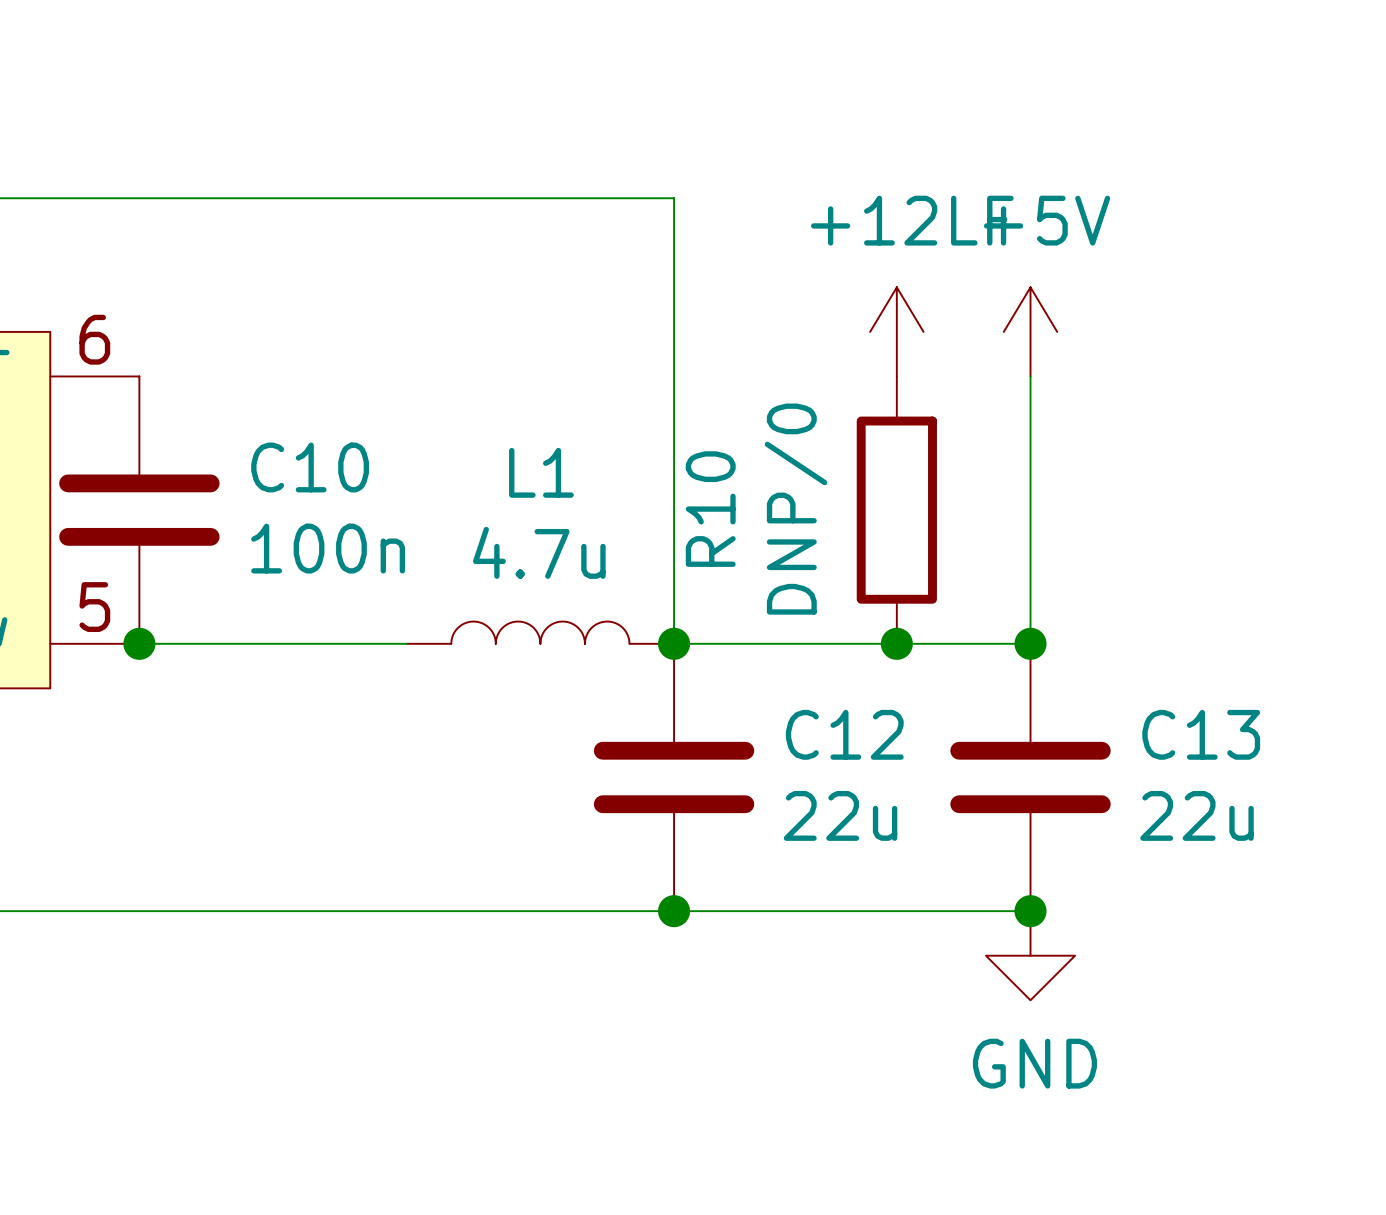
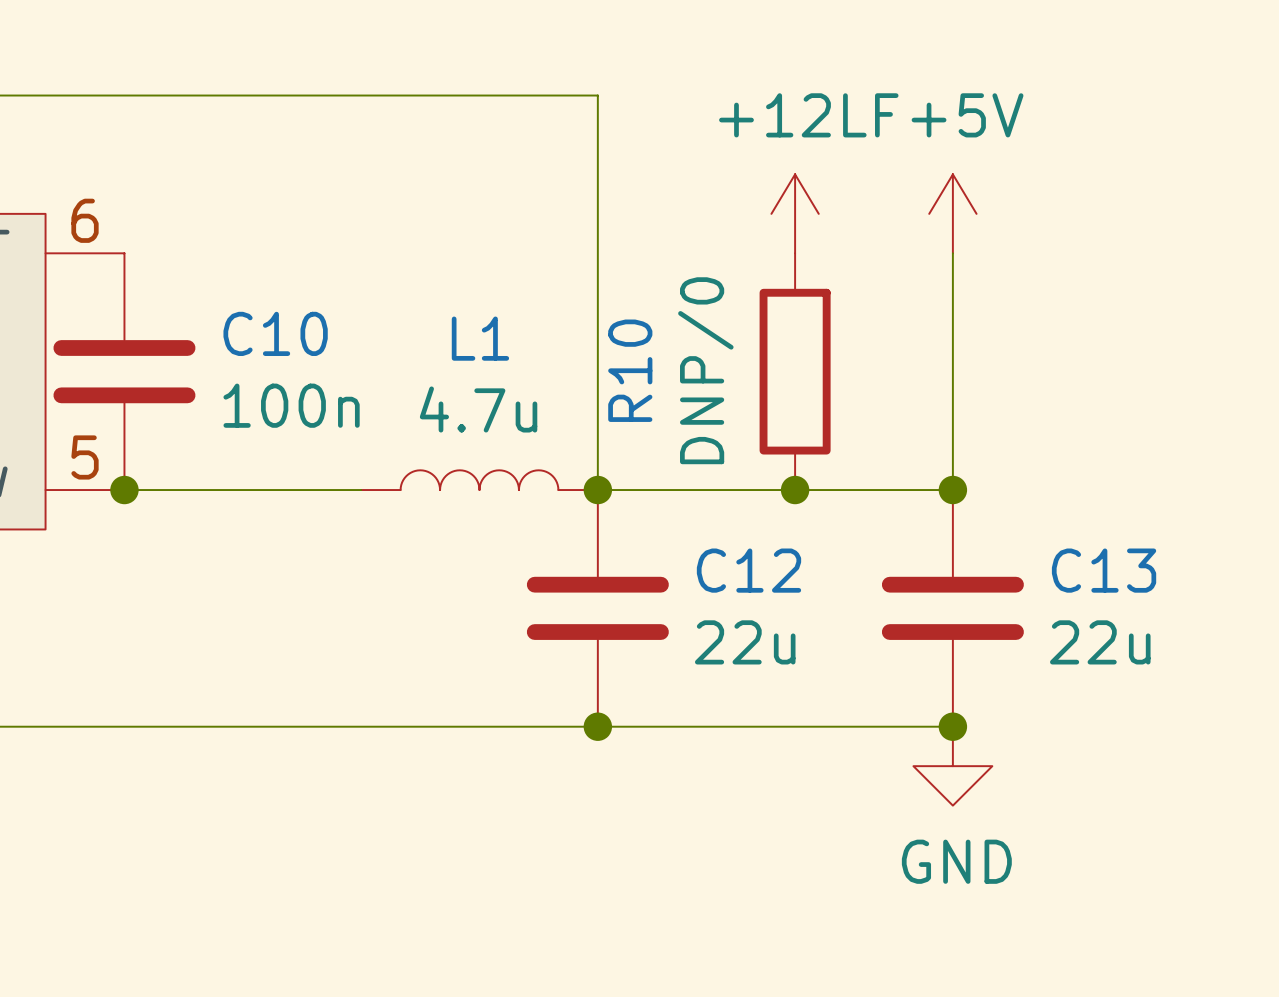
power symbol position: +5V (1030, 331) -> +5V (952, 213)
wire: (1030, 376) (1030, 643) -> (952, 253) (952, 490) (913, 490)
junction position: (1030, 643) -> (952, 490)
C13 position: (1030, 777) -> (952, 608)
wire: none -> (913, 726) (952, 726)
junction position: (1030, 911) -> (952, 726)
power symbol position: GND (1030, 955) -> GND (952, 766)

